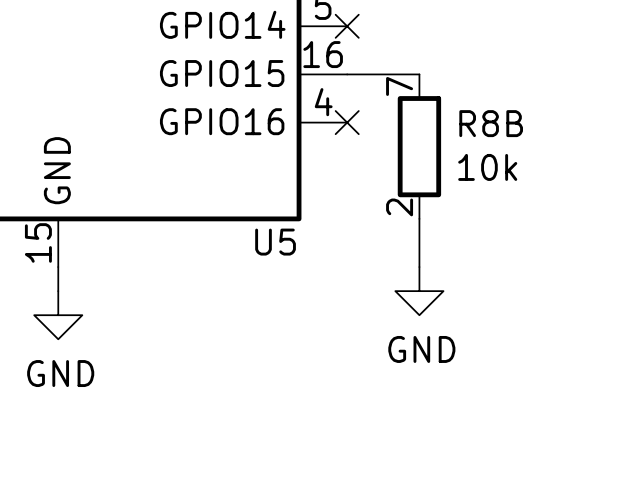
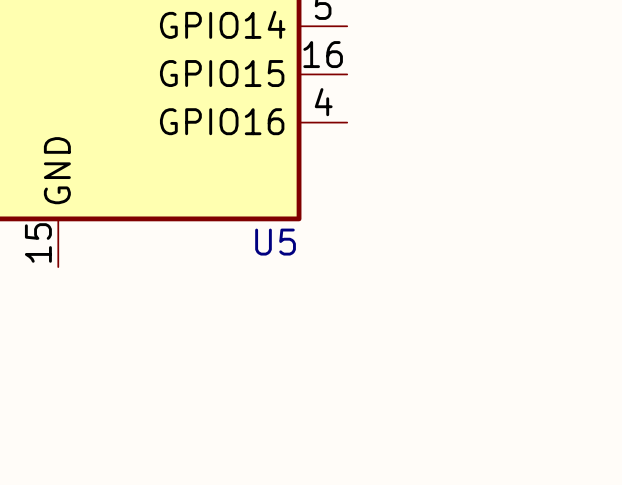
no-connect mark: (347, 26) -> none
wire: (347, 74) (419, 74) -> none
no-connect mark: (347, 122) -> none
R8B: 10k (419, 146) -> none
wire: (419, 218) (419, 267) -> none
wire: (58, 267) (58, 291) -> none
power symbol: GND (419, 291) -> none
power symbol: GND (58, 315) -> none

